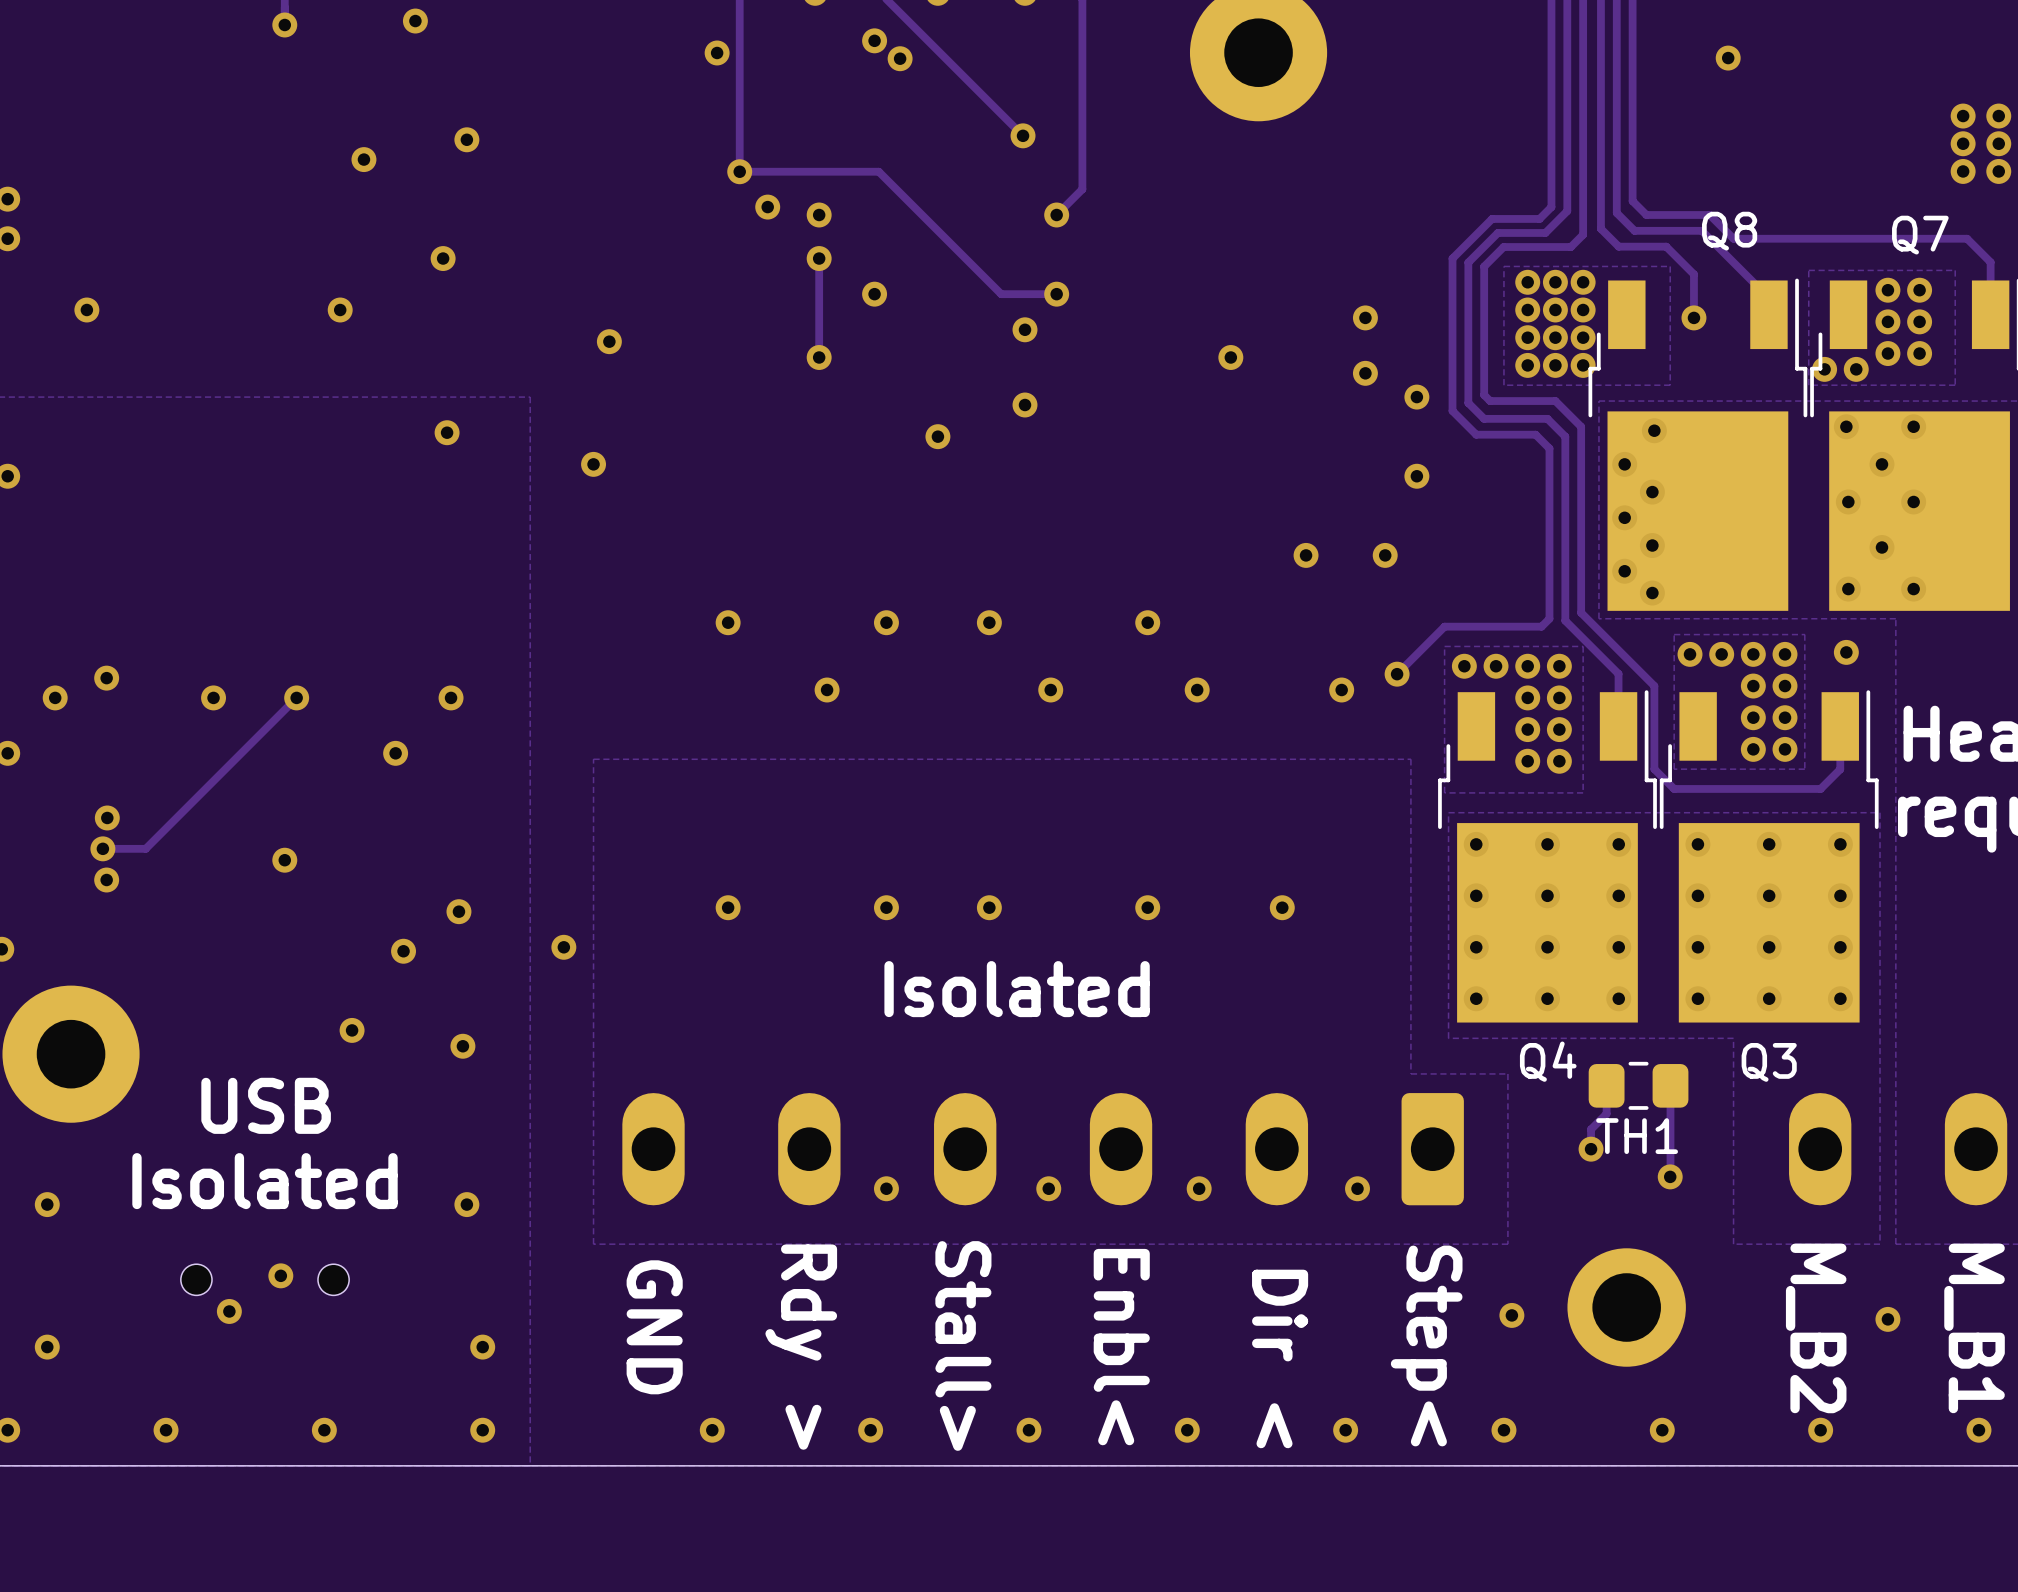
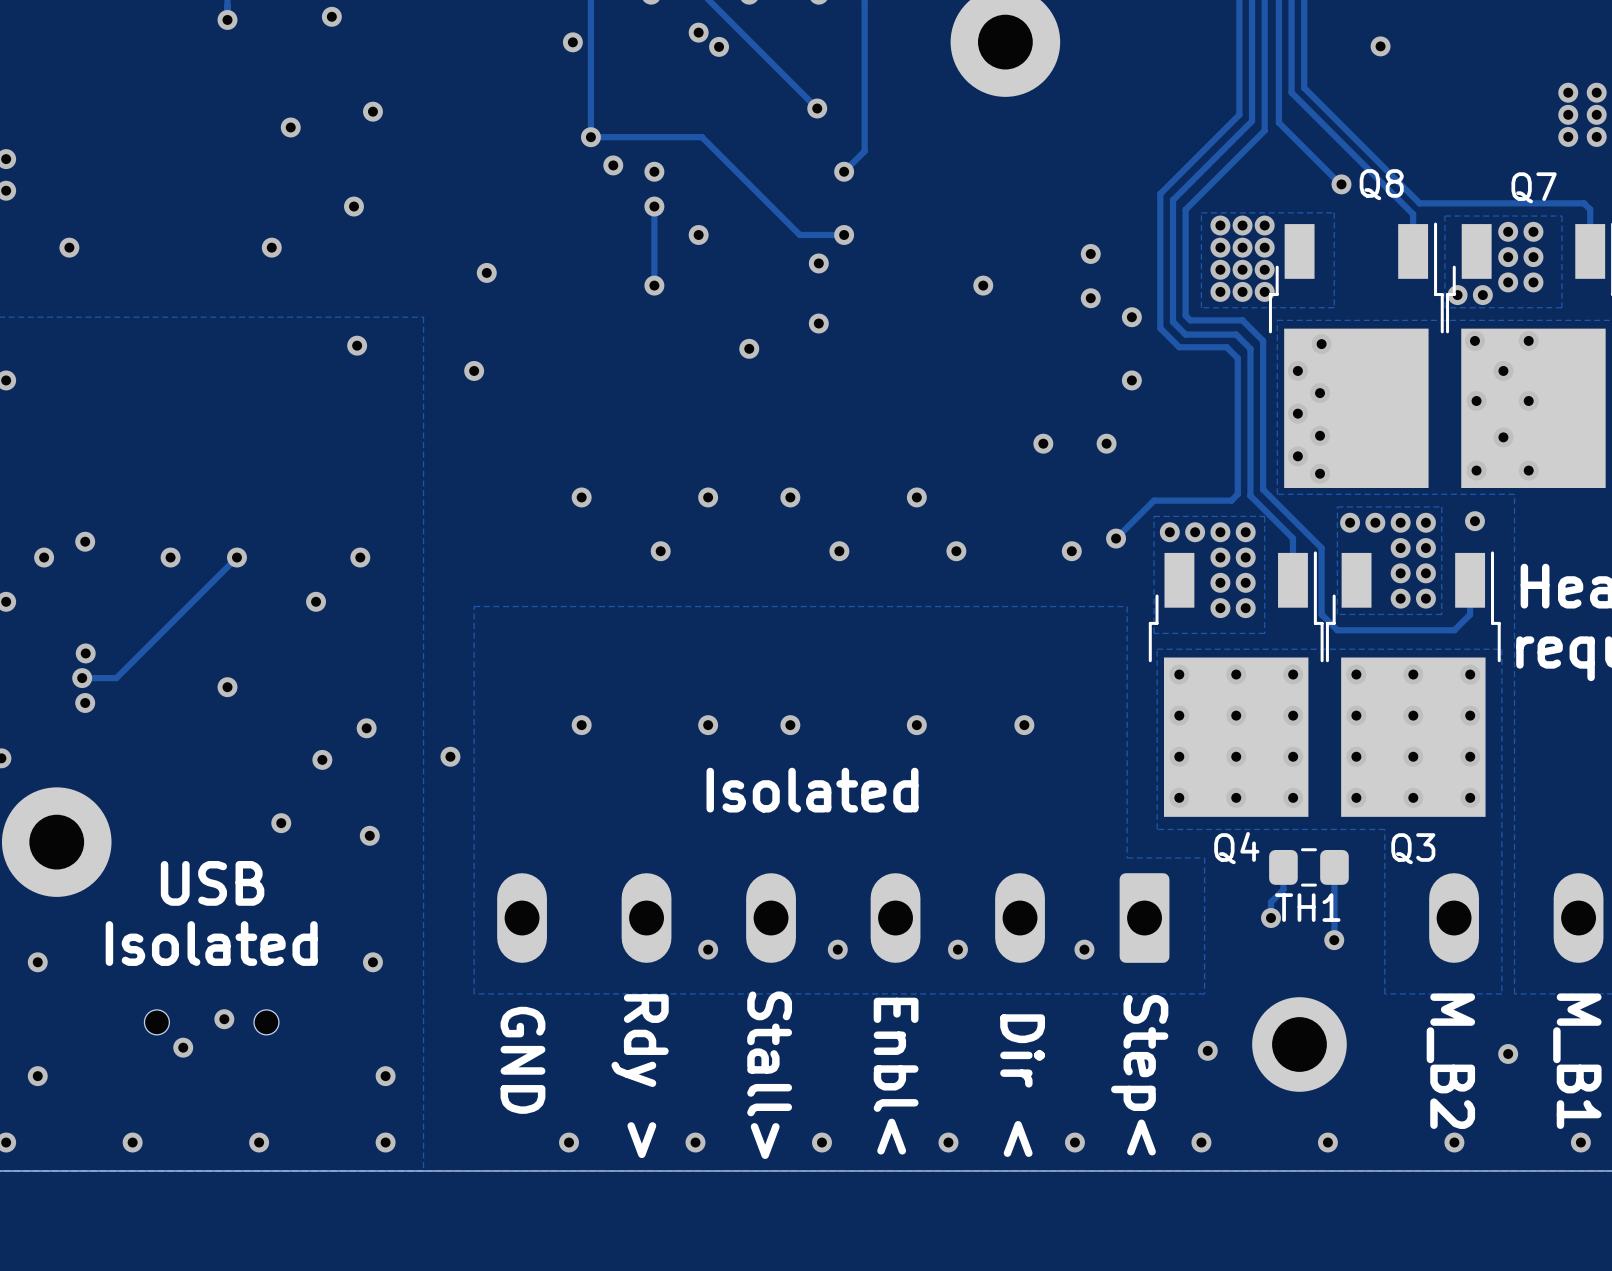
track: (1632, 110) (1632, 201) (1646, 214) (1709, 214) (1733, 238) (1967, 238) (1982, 254) -> (1304, 87) (1419, 203) (1584, 203)
track: (1616, 115) (1616, 213) (1634, 230) (1678, 230) -> (1278, 122) (1340, 184)
track: (1551, 143) (1551, 207) (1539, 218) (1492, 218) (1452, 258) -> (1239, 114) (1160, 193) (1160, 206)
track: (1567, 151) (1567, 211) (1545, 232) (1497, 232) (1468, 262) -> (1252, 121) (1172, 200) (1172, 209)
track: (1600, 153) (1600, 228) (1618, 246) (1666, 246) (1693, 274) (1693, 317) -> none
track: (1583, 163) (1583, 234) (1570, 247) (1503, 247) (1484, 266) -> (1264, 130) (1185, 209) (1185, 212)
track: (1679, 230) (1701, 230) (1768, 297) -> (1291, 92) (1413, 214) (1413, 237)
via position: (1693, 317) -> (1341, 184)

